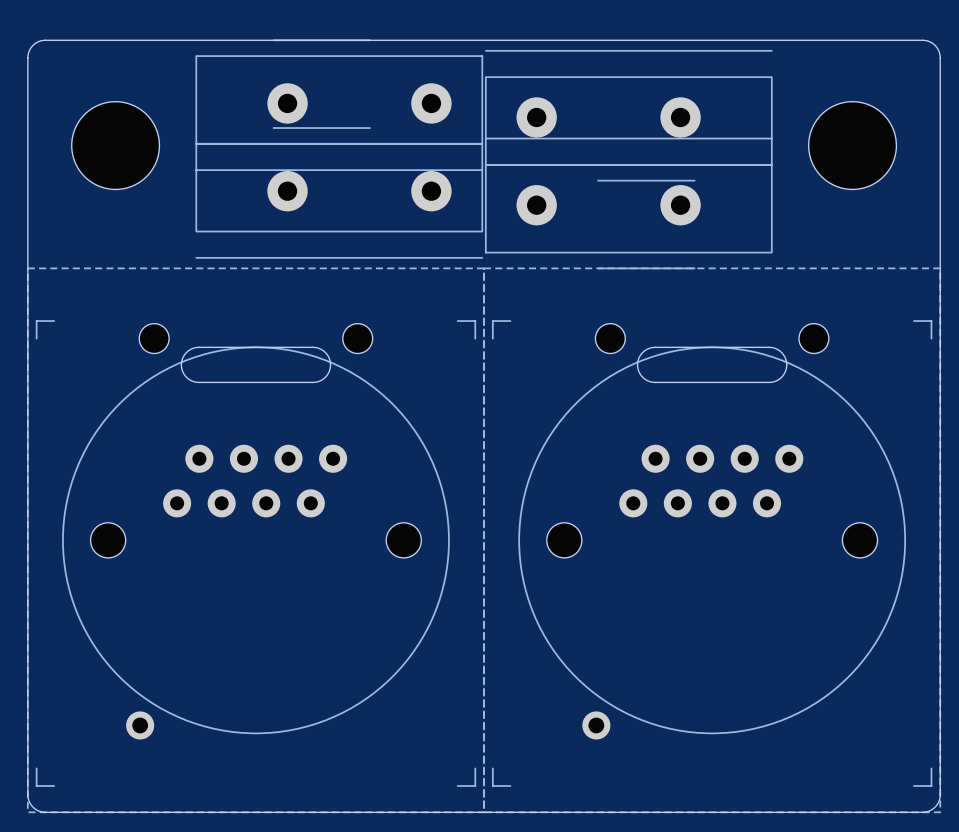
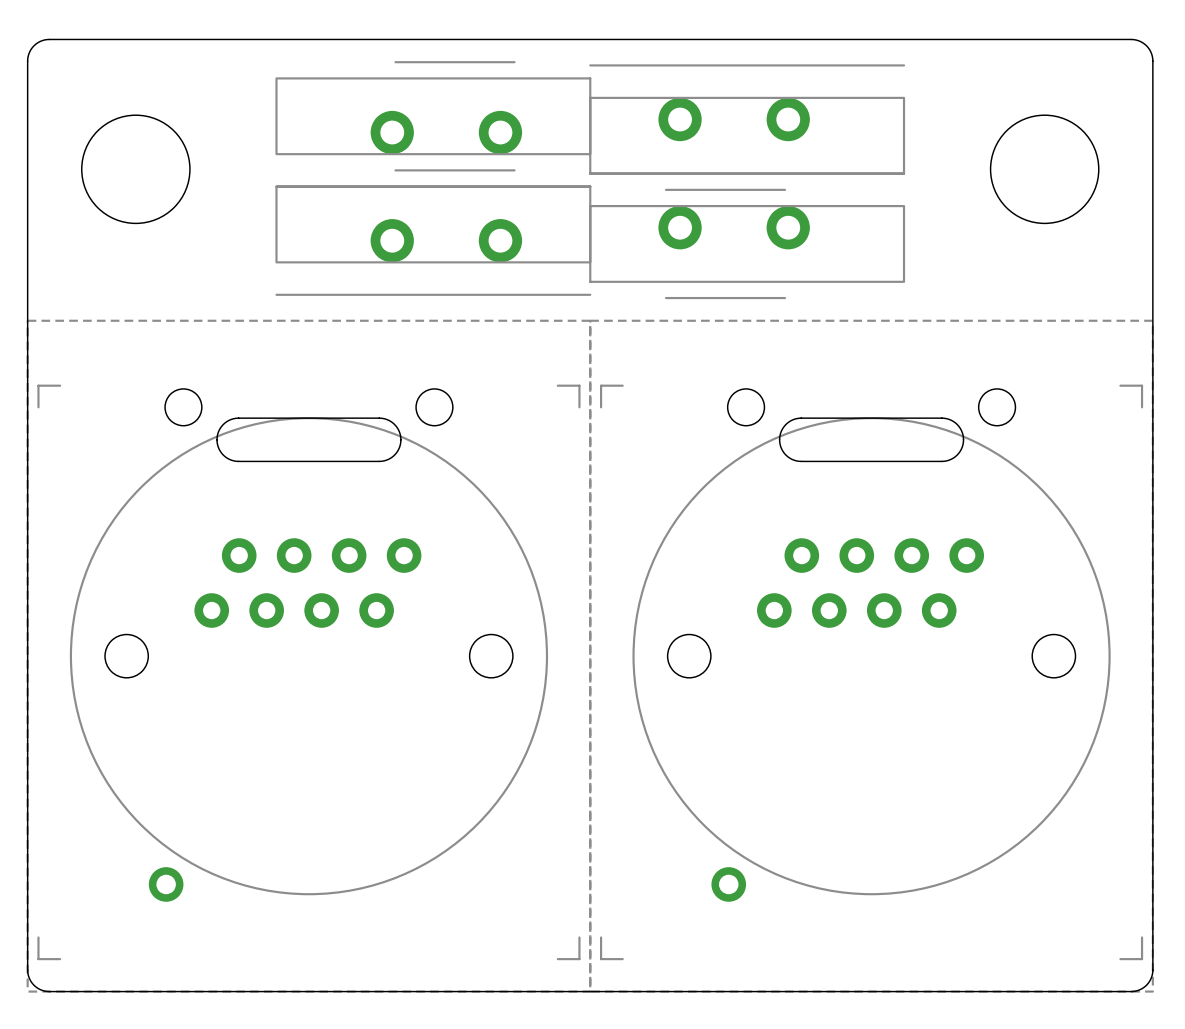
part: (339, 105) -> none
part: none -> (433, 124)
part: none -> (747, 127)
part: (628, 115) -> none
part: (339, 192) -> none
part: none -> (433, 232)
part: none -> (747, 235)
part: (628, 203) -> none

